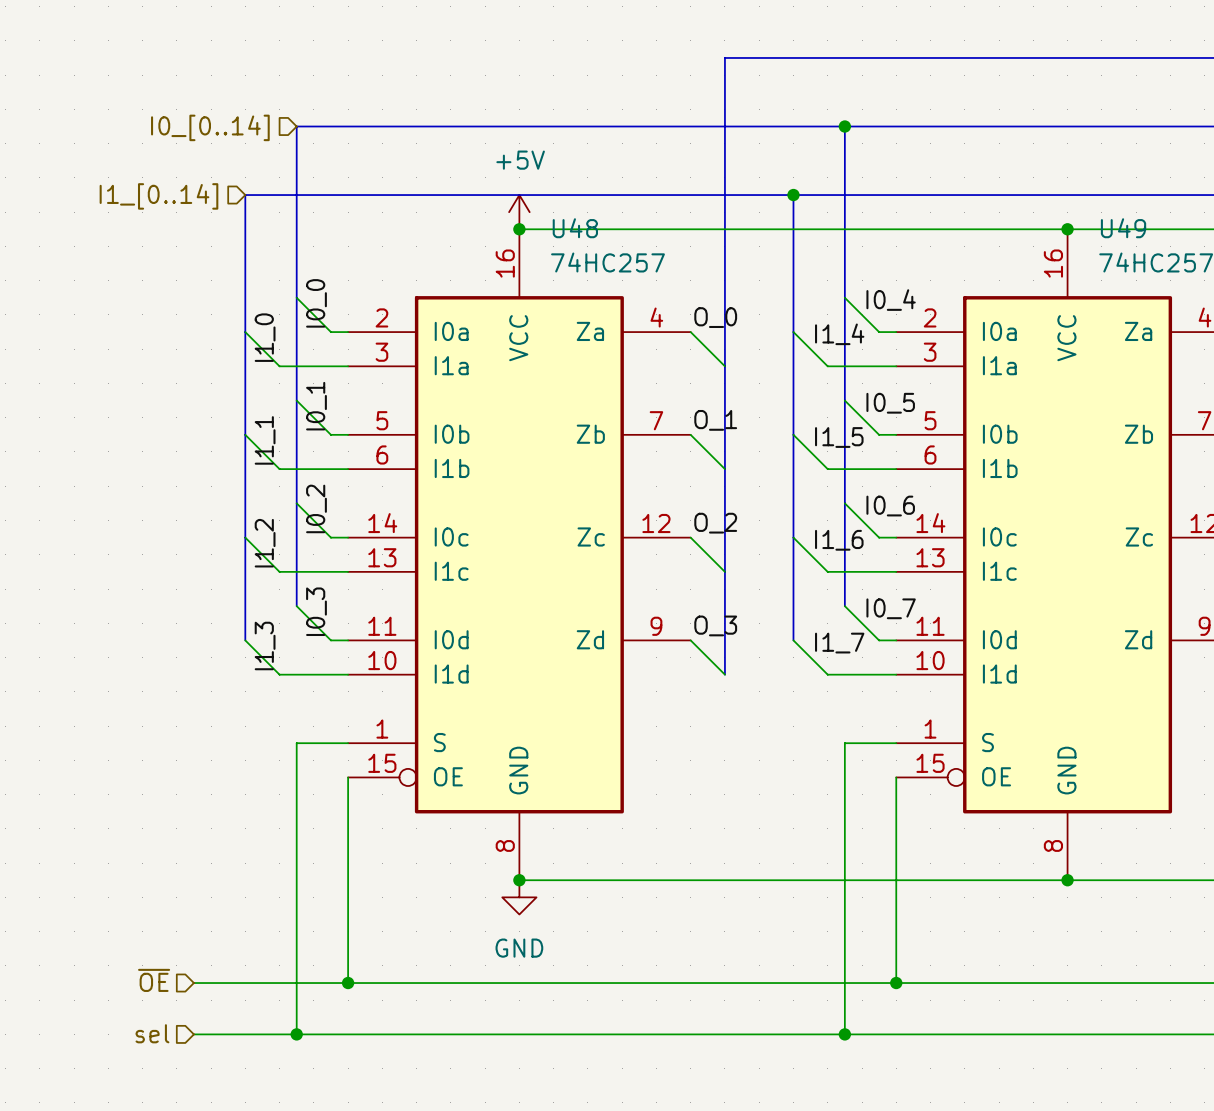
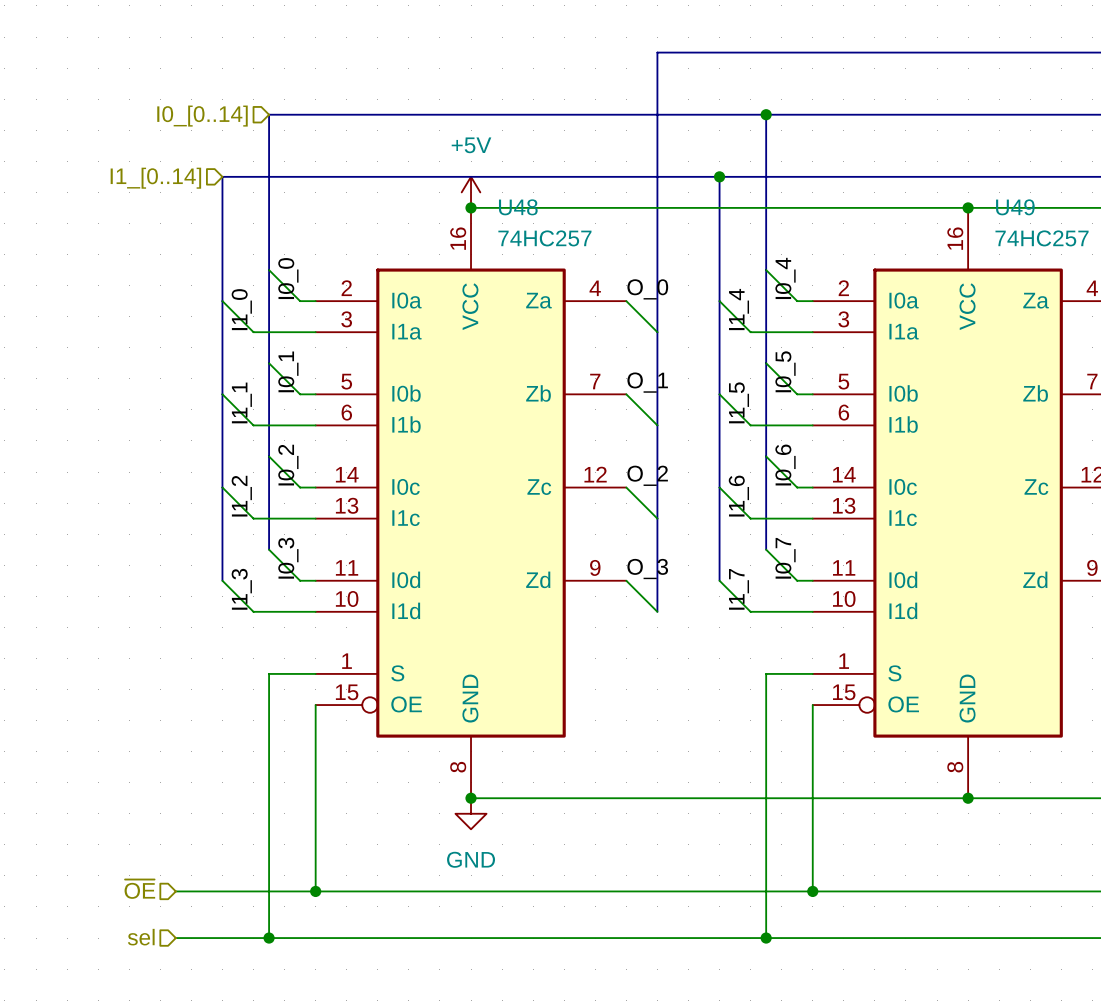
label rotation: 0° (891, 300) -> 90° counterclockwise (785, 278)
label rotation: 0° (839, 334) -> 90° counterclockwise (739, 309)
label rotation: 0° (890, 403) -> 90° counterclockwise (785, 371)
label rotation: 0° (839, 437) -> 90° counterclockwise (739, 402)
label rotation: 0° (890, 506) -> 90° counterclockwise (785, 465)
label rotation: 0° (839, 540) -> 90° counterclockwise (738, 496)
label rotation: 0° (891, 608) -> 90° counterclockwise (785, 558)
label rotation: 0° (839, 643) -> 90° counterclockwise (739, 589)

